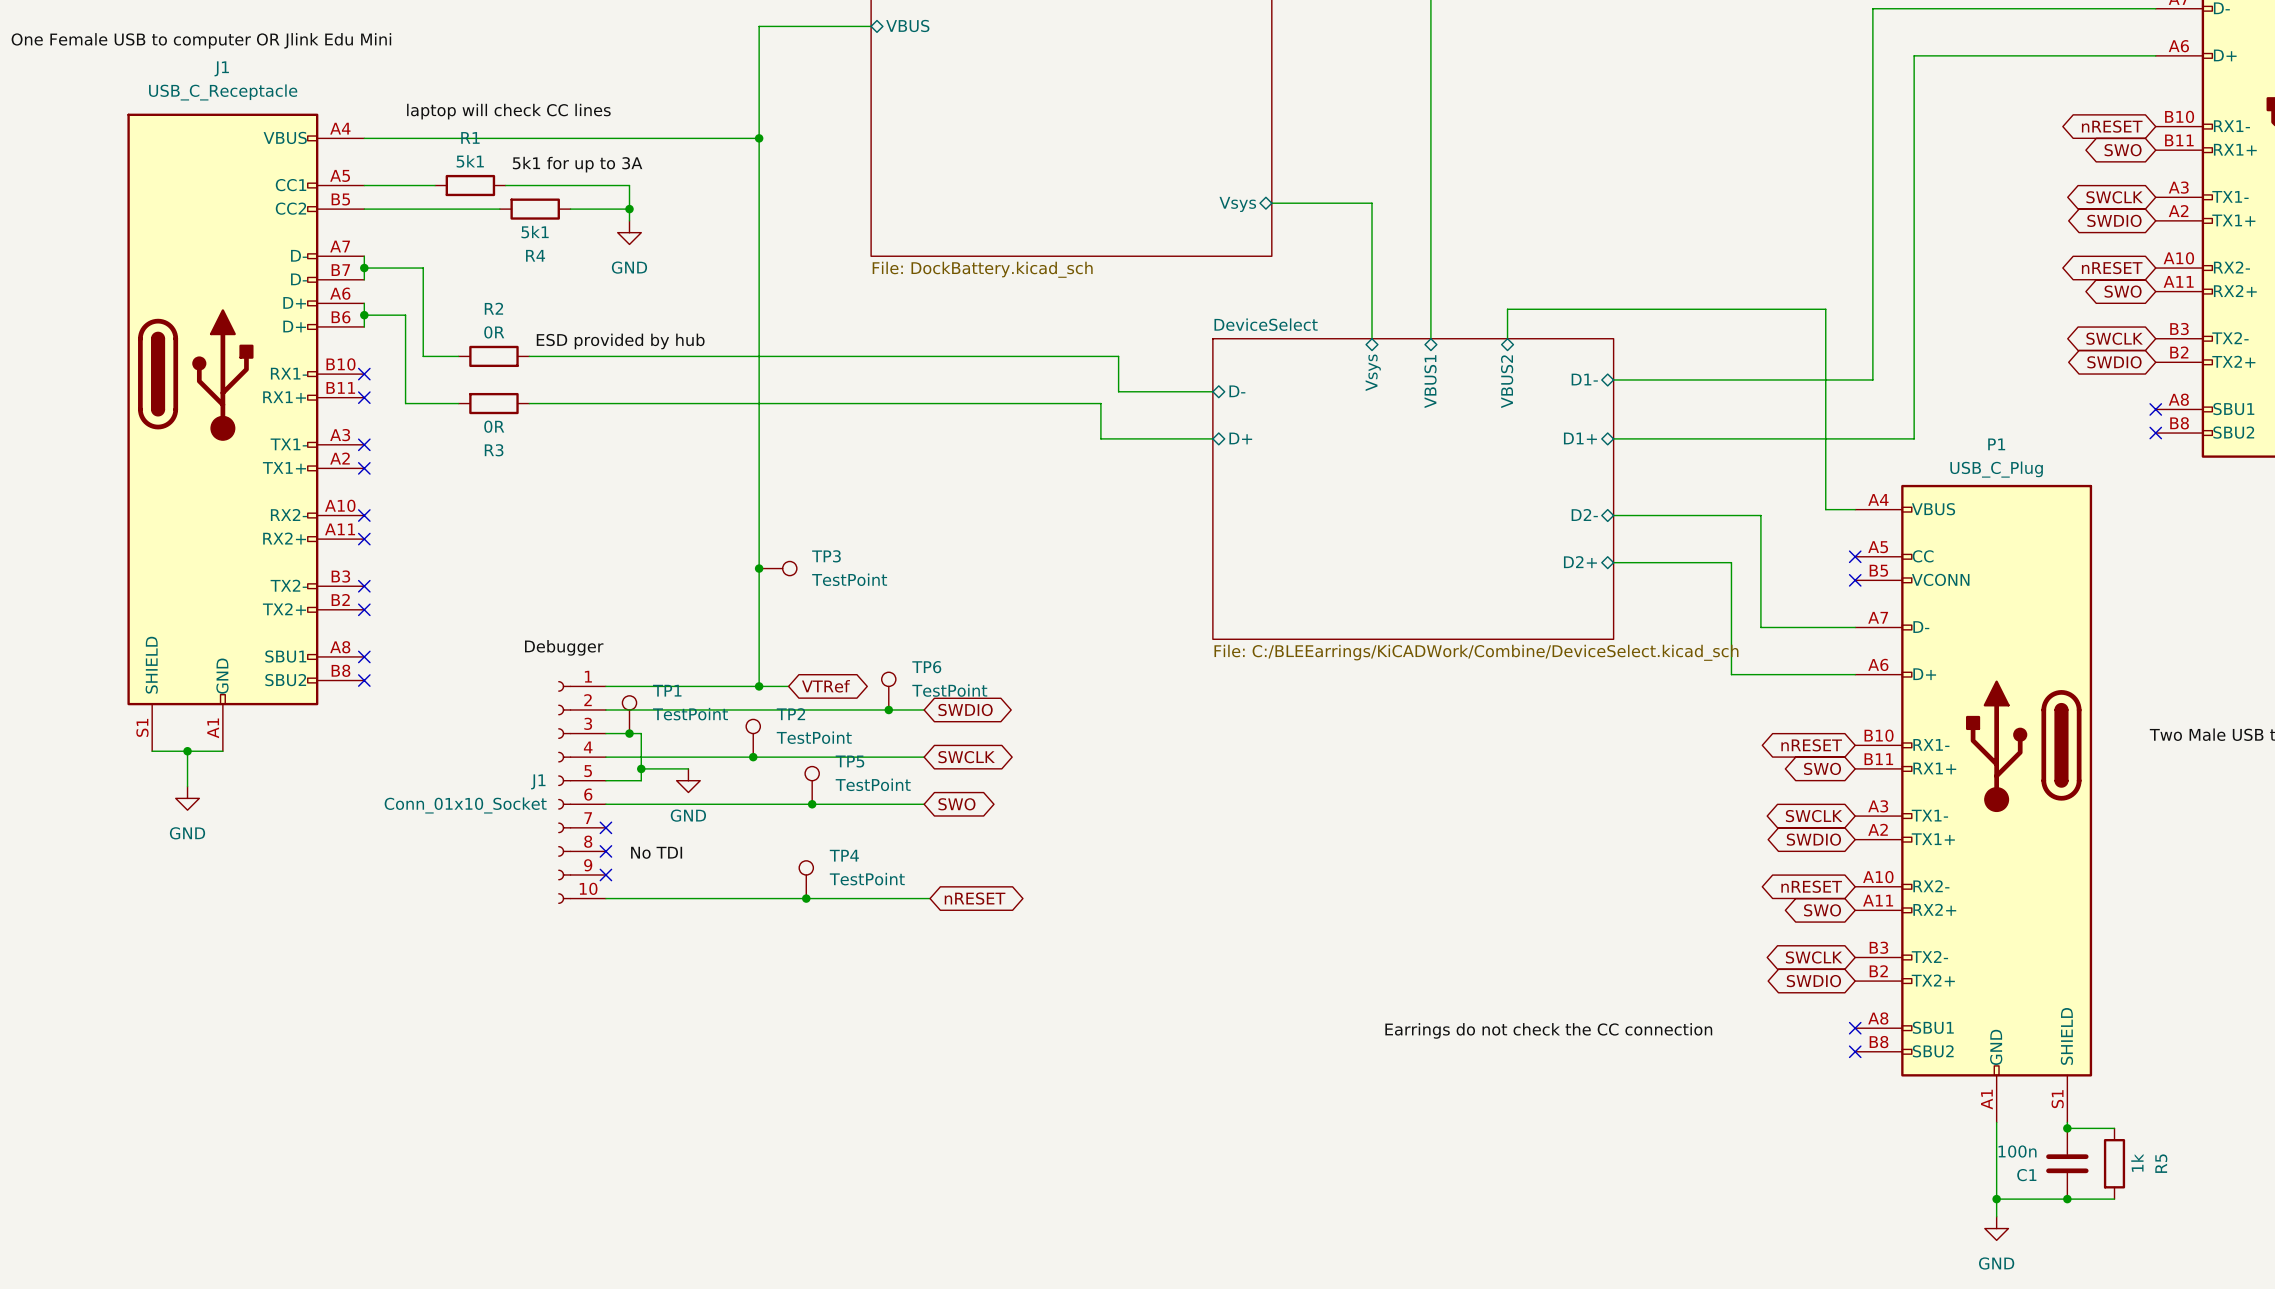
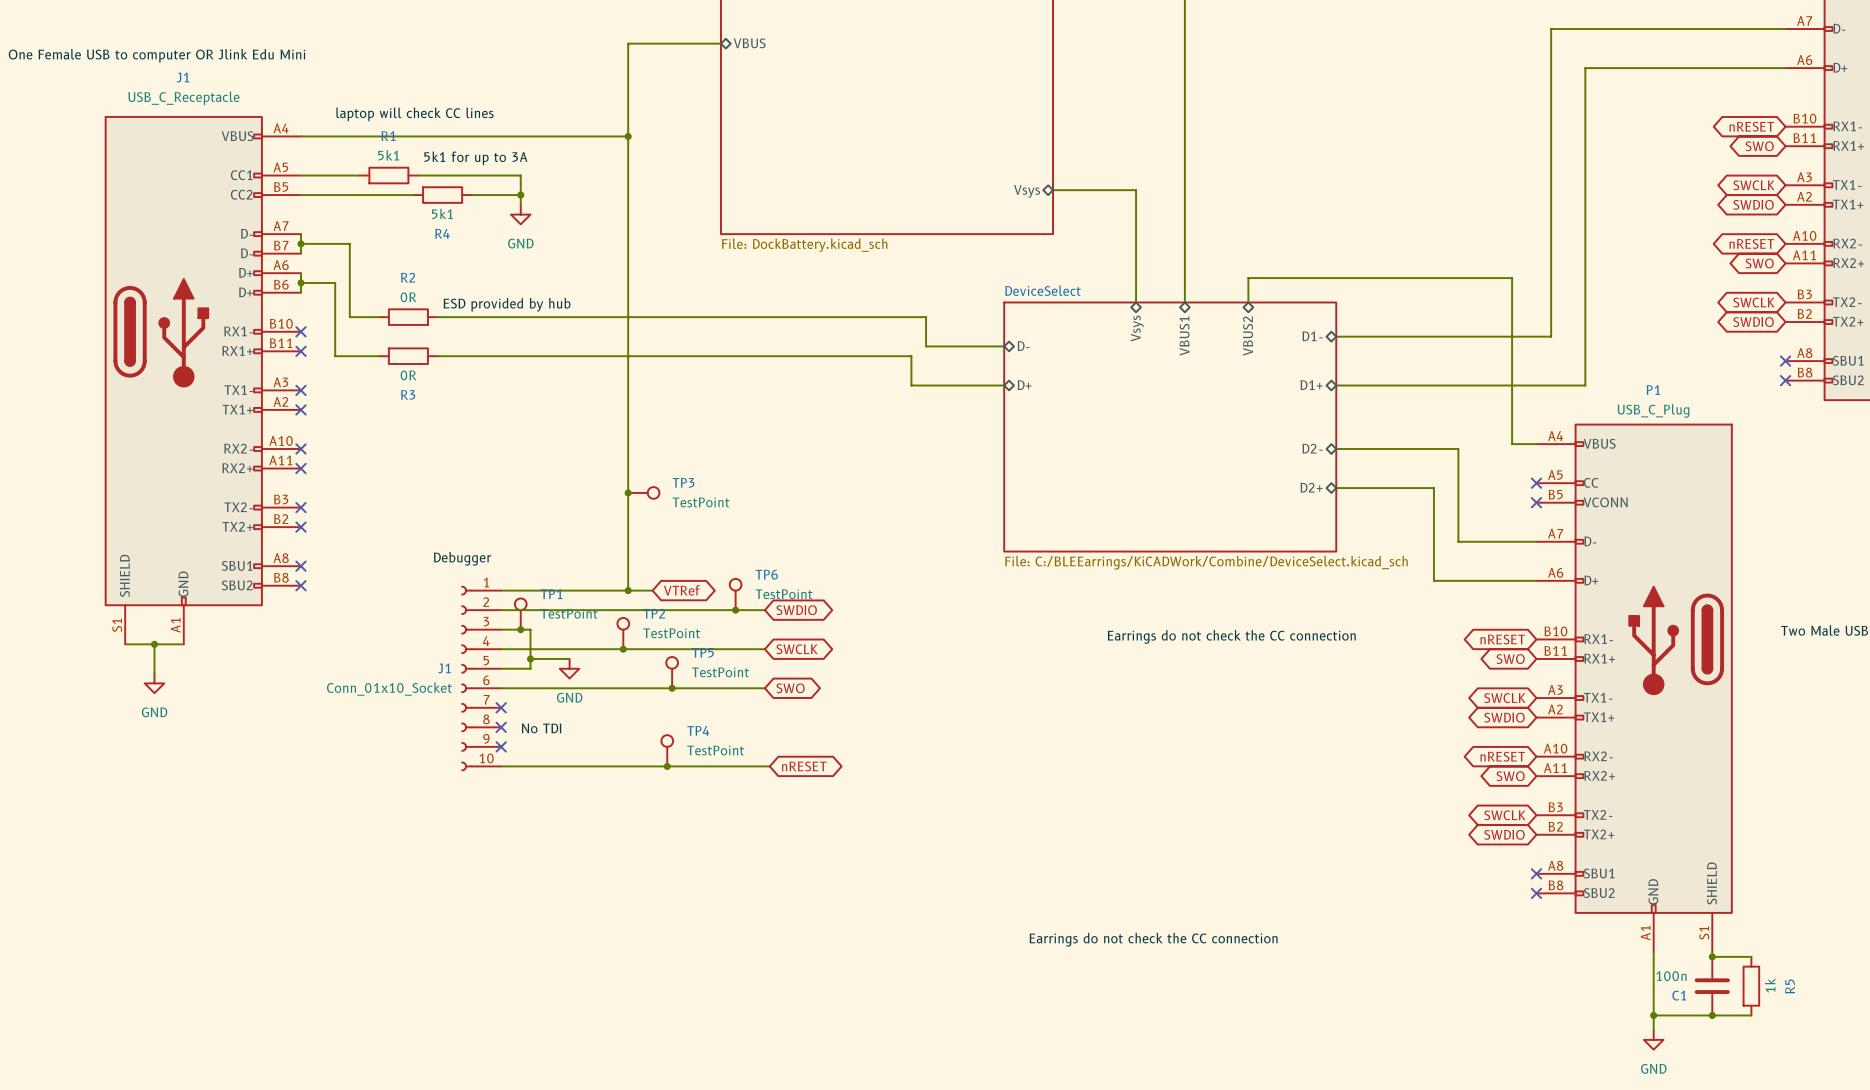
label: none -> Earrings do not check the CC connection (1231, 636)
label: Earrings do not check the CC connection (1548, 1030) -> none
label: none -> Earrings do not check the CC connection (1153, 939)

